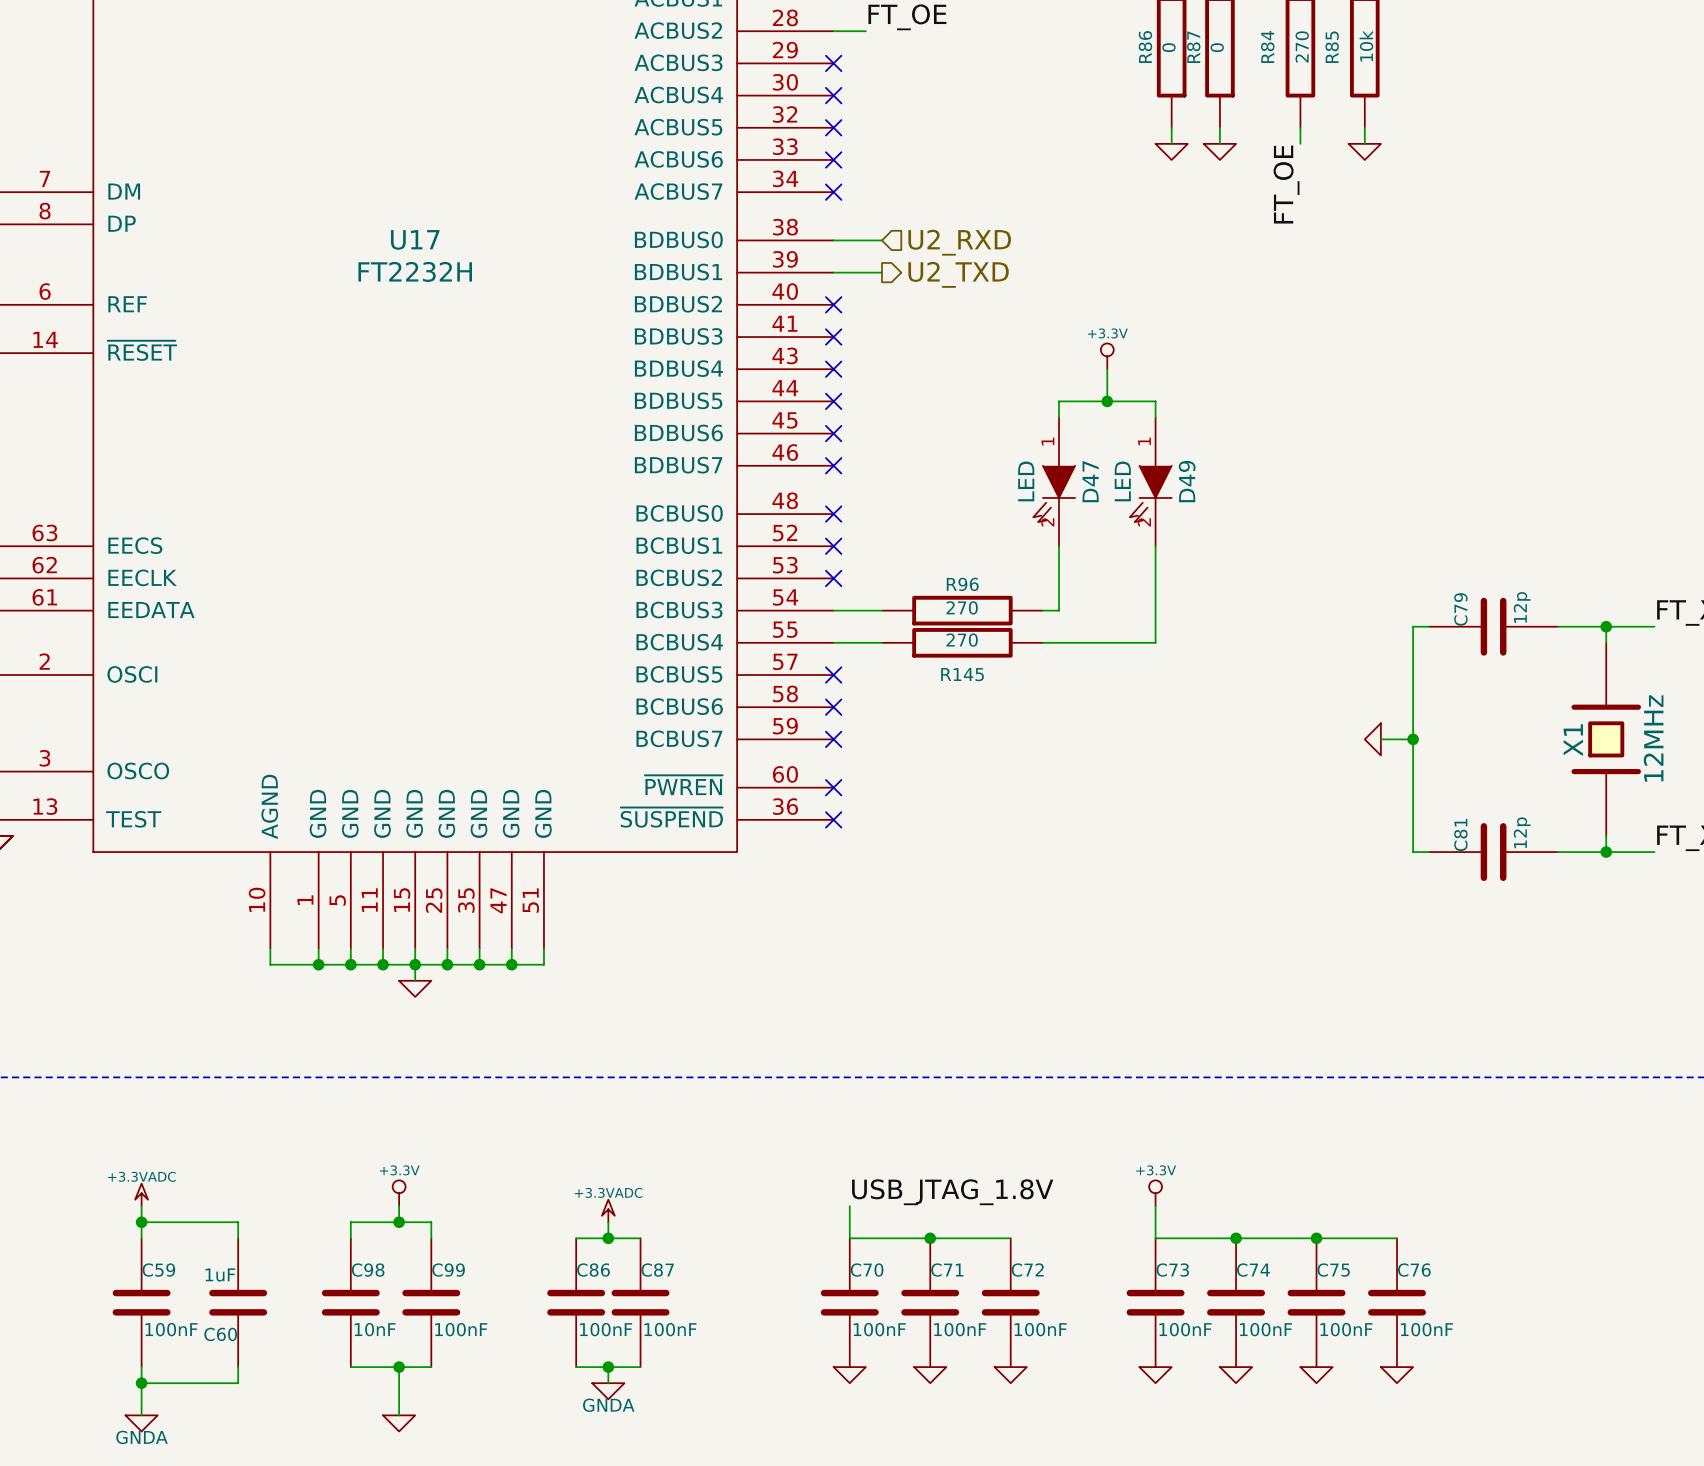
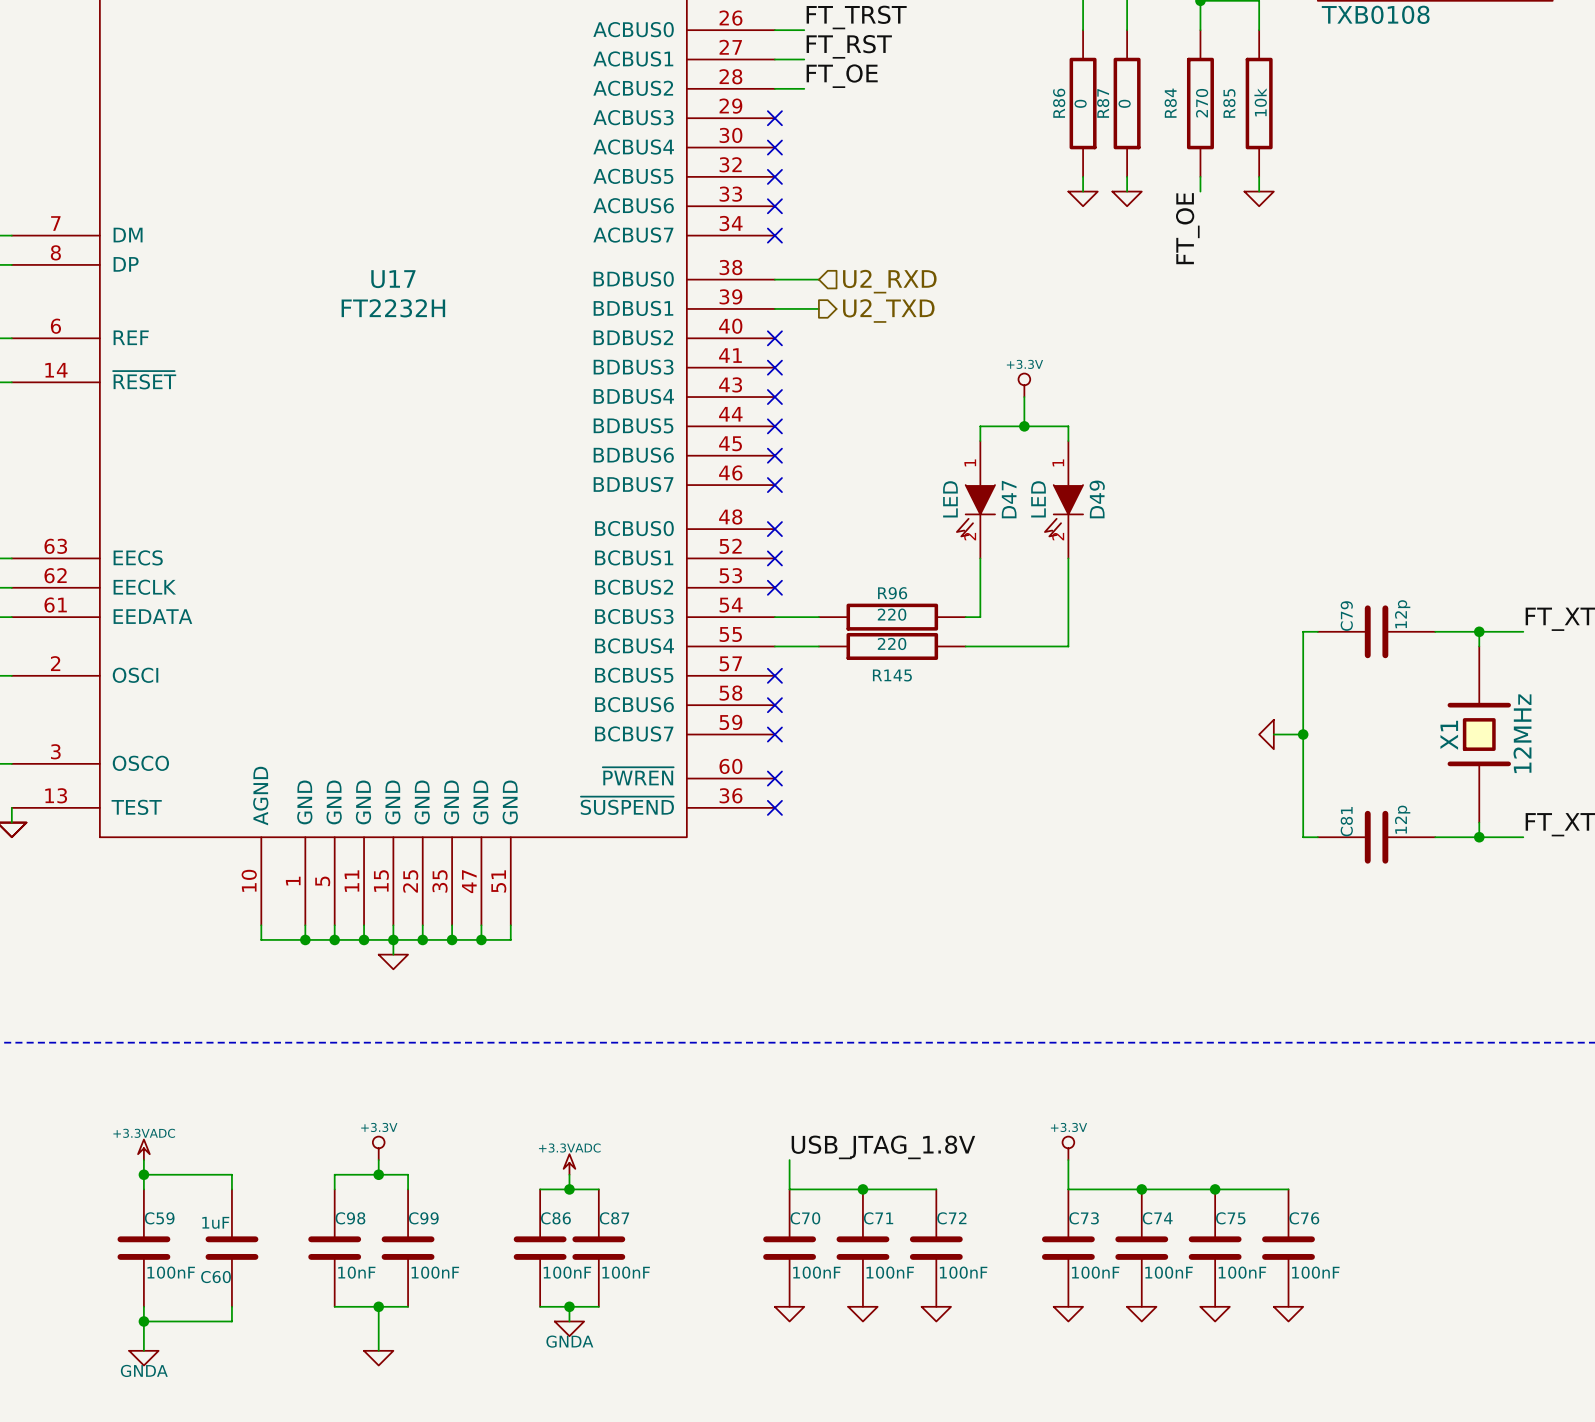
R96 value: 270 (962, 607) -> 220 (892, 614)
R145 value: 270 (962, 640) -> 220 (892, 643)

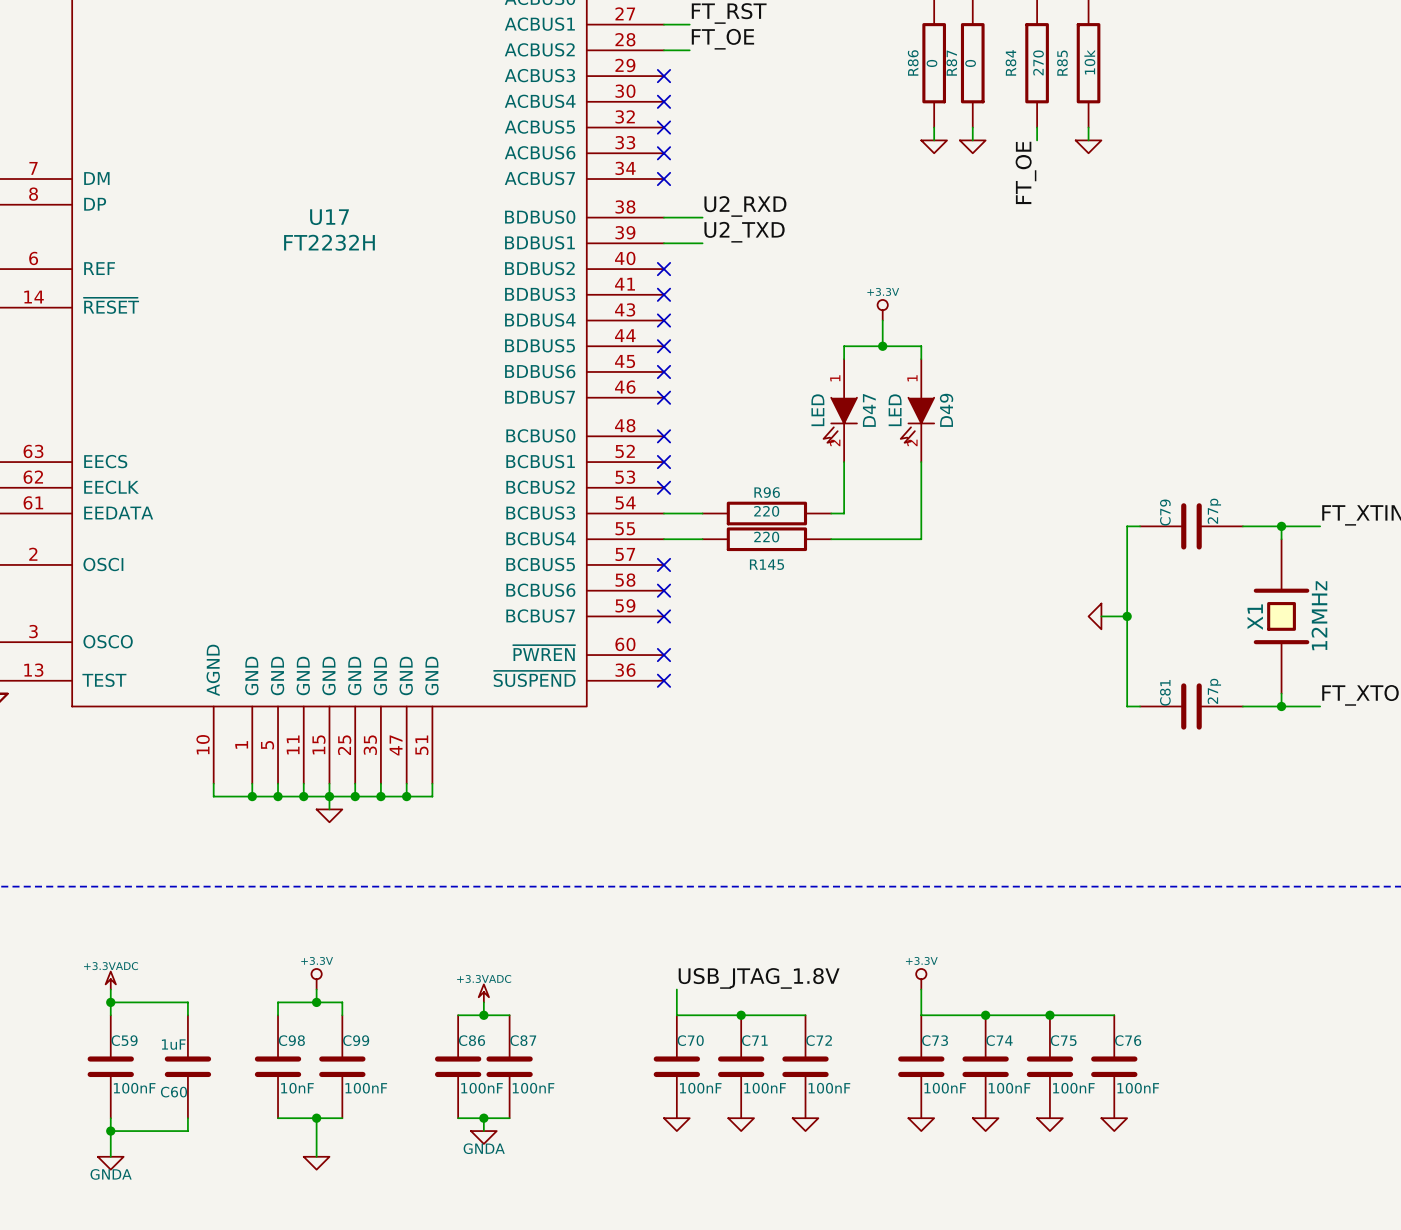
label: none -> U2_RXD (745, 206)
hierarchical label: U2_RXD (889, 281) -> none
label: none -> U2_TXD (744, 232)
hierarchical label: U2_TXD (888, 311) -> none
C79 value: 12p (1402, 614) -> 27p (1214, 511)
C81 value: 12p (1402, 819) -> 27p (1214, 691)

